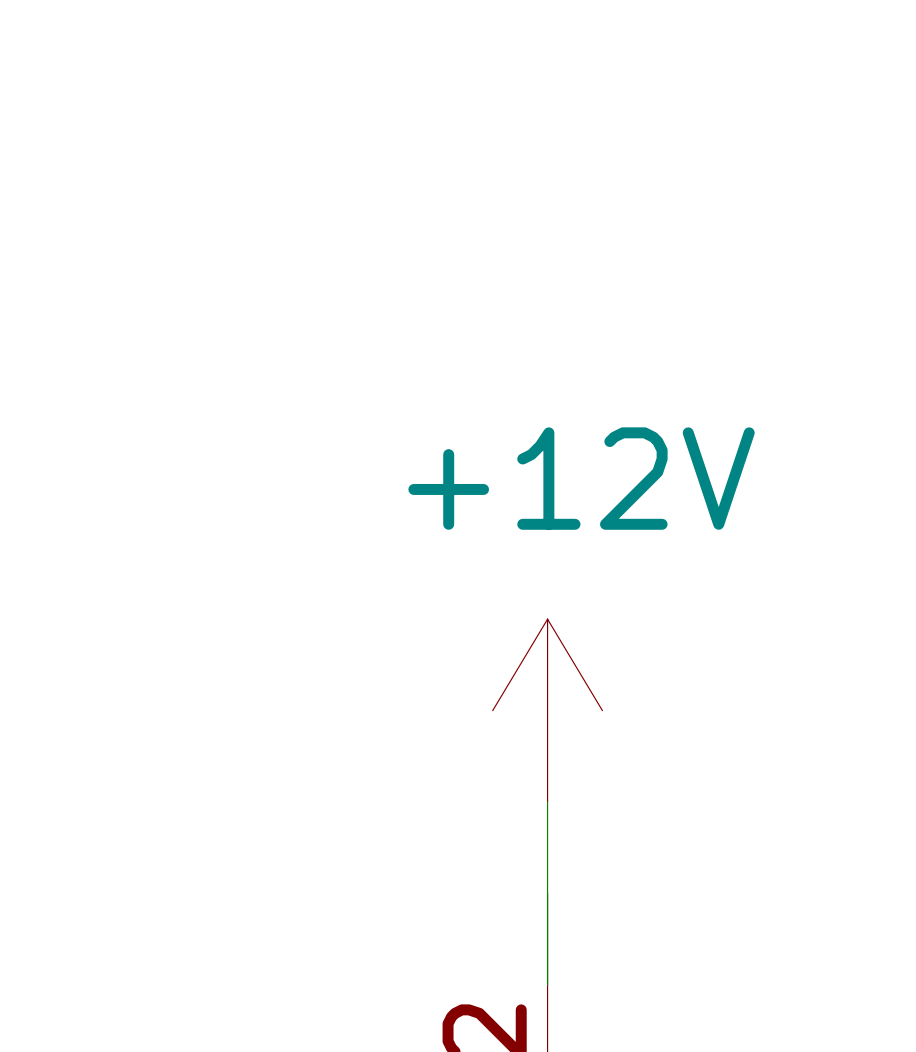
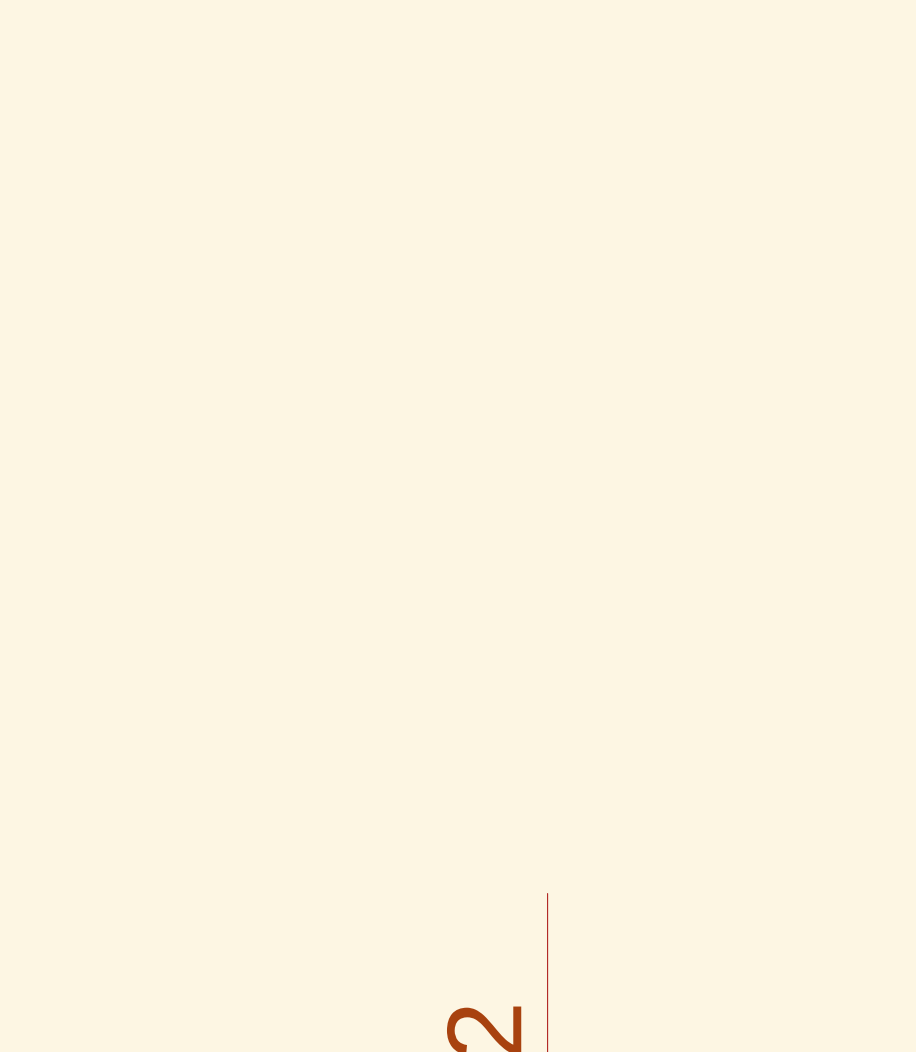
power symbol: +12V (547, 710) -> none
wire: (547, 802) (547, 985) -> none

